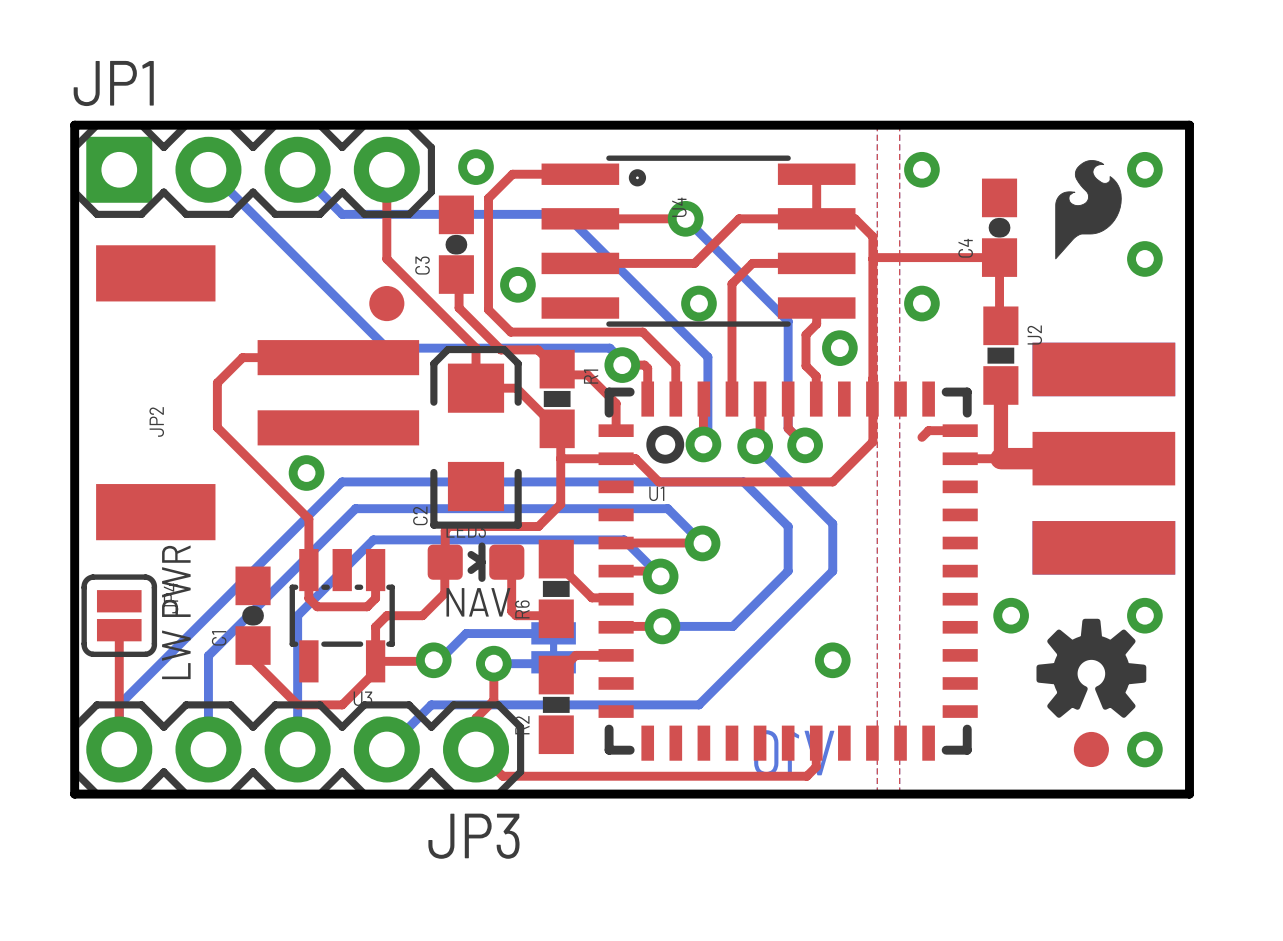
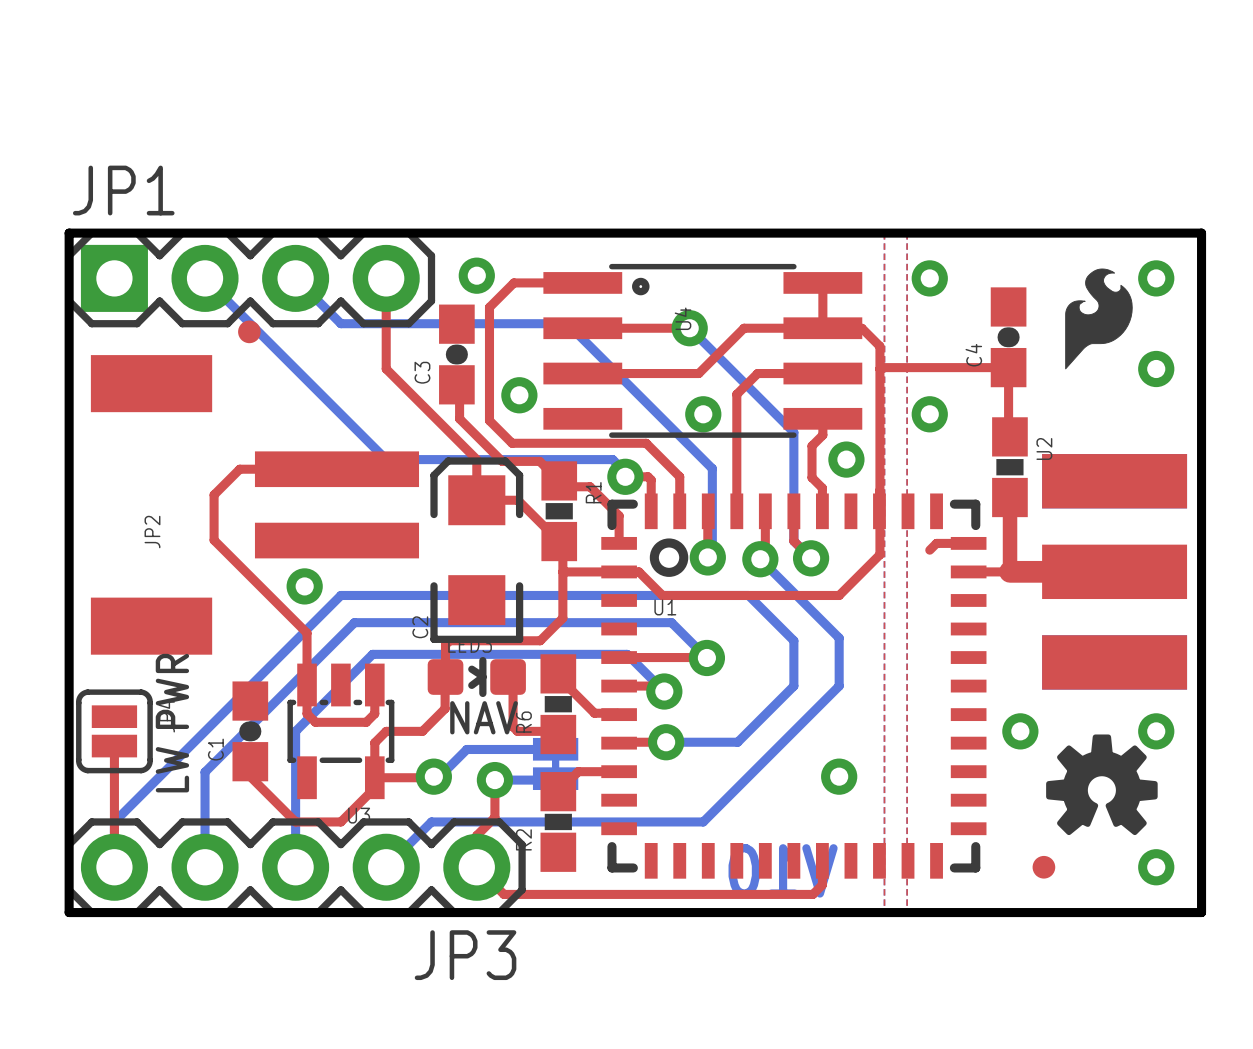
part: none -> (249, 331)
part: (386, 303) -> none
part: none -> (1043, 867)
part: (1091, 749) -> none

